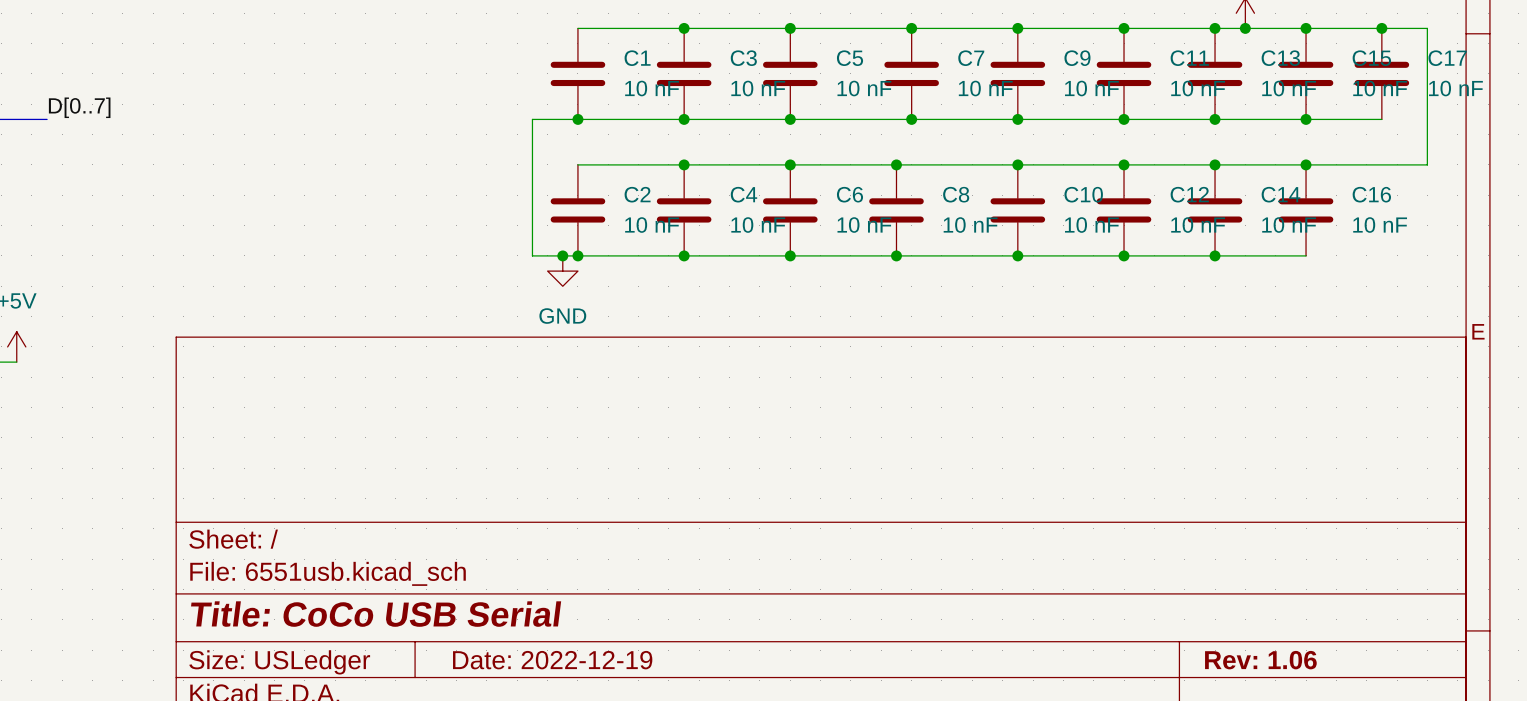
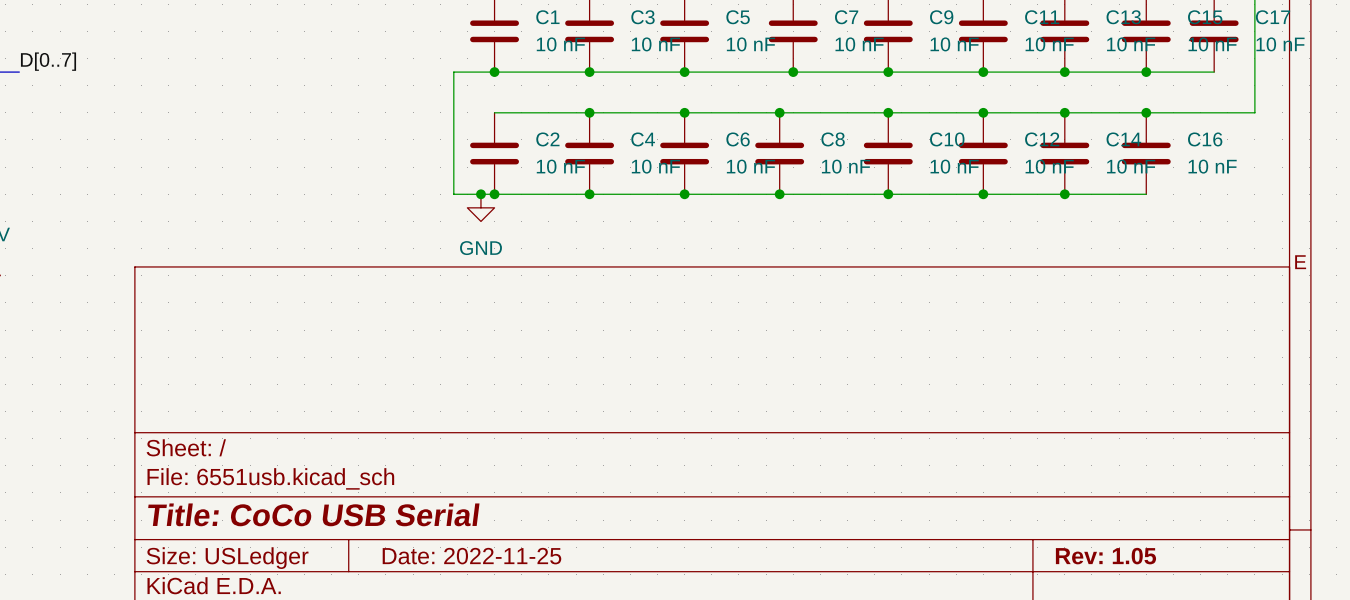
title block: Date: 2022-12-19 (552, 660) -> Date: 2022-11-25 (471, 556)
title block: Rev: 1.06 (1260, 660) -> Rev: 1.05 (1105, 556)

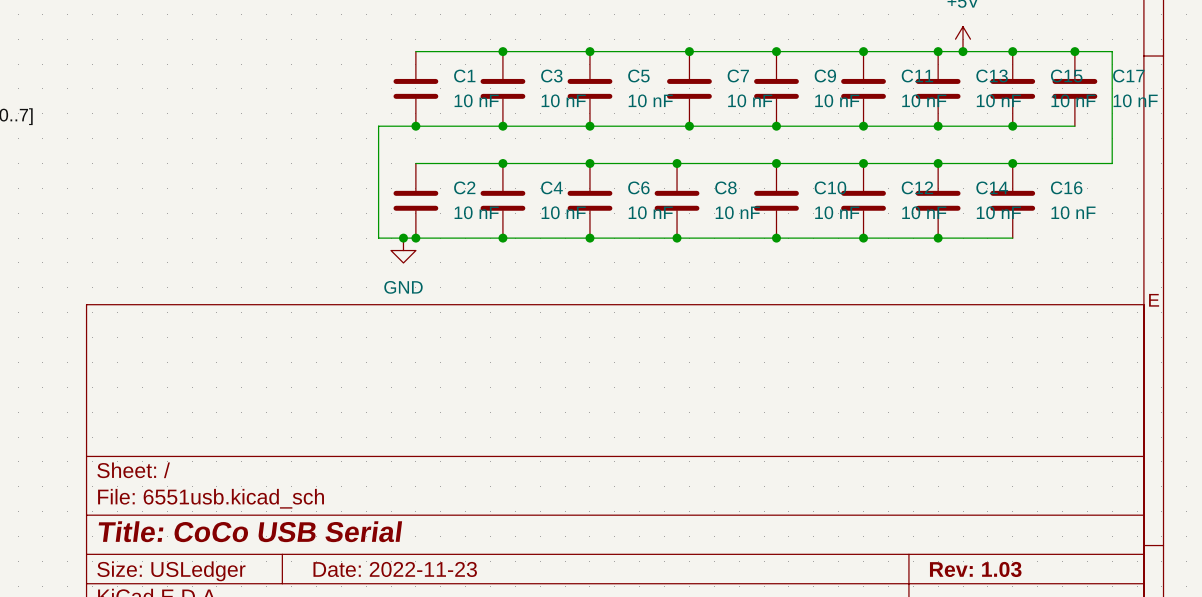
title block: Date: 2022-11-25 (471, 556) -> Date: 2022-11-23 (395, 569)
title block: Rev: 1.05 (1105, 556) -> Rev: 1.03 (975, 569)

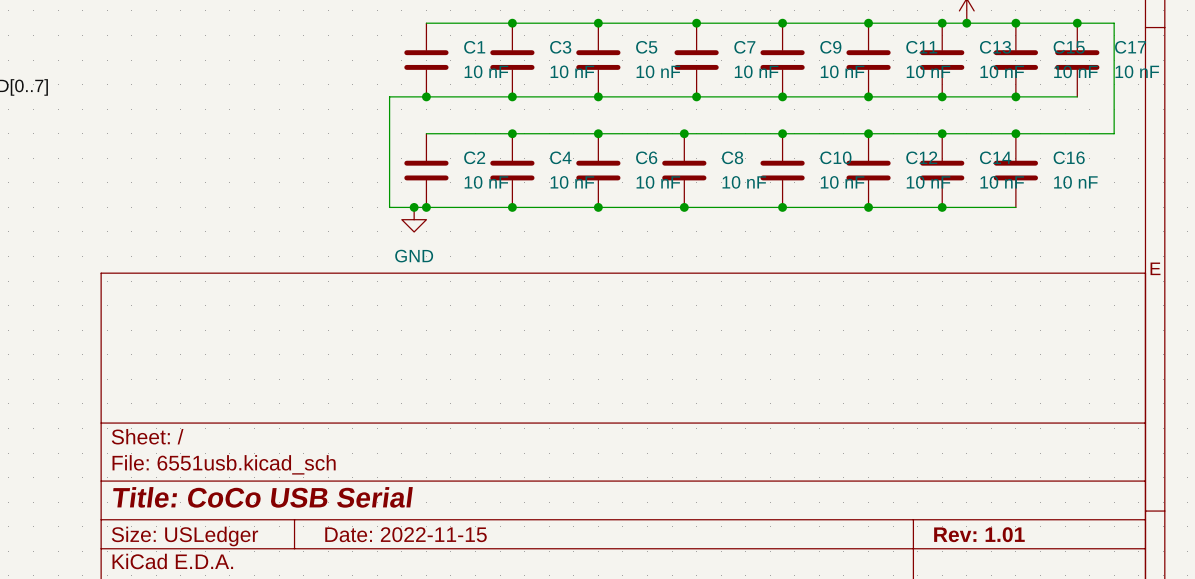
title block: Date: 2022-11-23 (395, 569) -> Date: 2022-11-15 (406, 534)
title block: Rev: 1.03 (975, 569) -> Rev: 1.01 (979, 534)

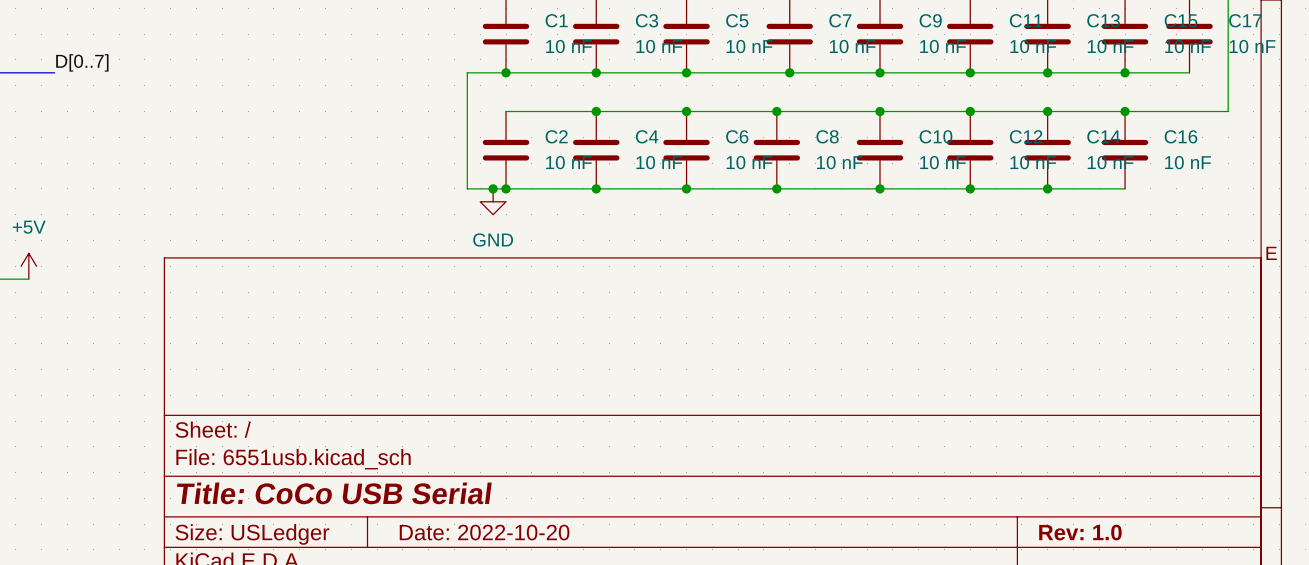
title block: Date: 2022-11-15 (406, 534) -> Date: 2022-10-20 (484, 532)
title block: Rev: 1.01 (979, 534) -> Rev: 1.0 (1080, 532)

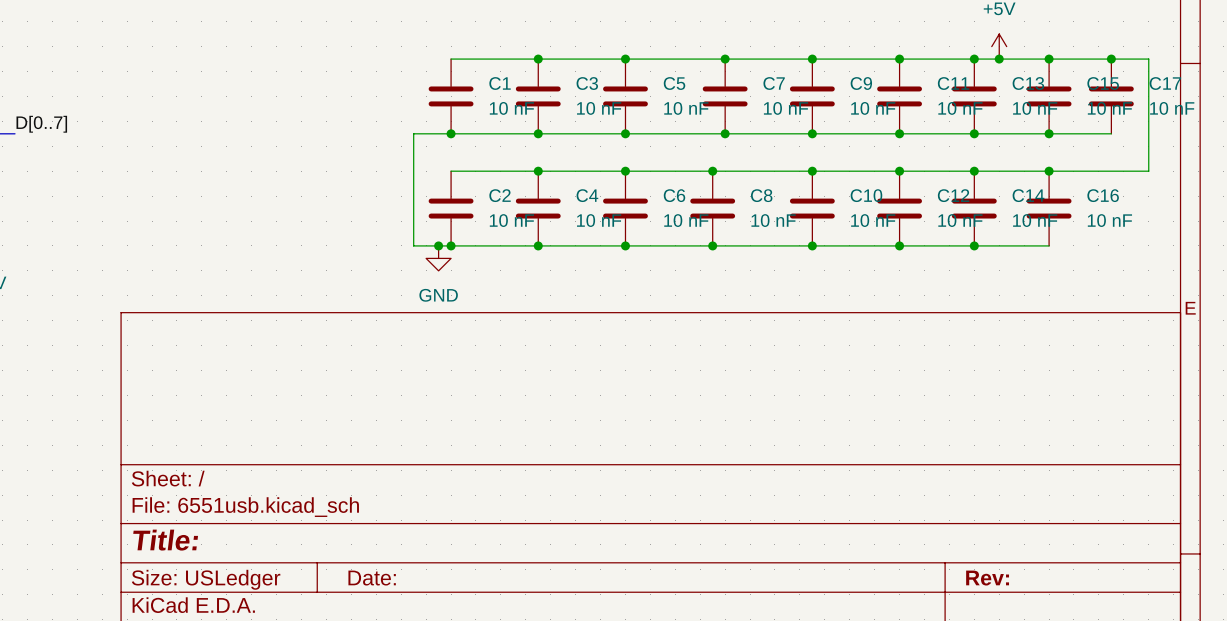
title block: Title: CoCo USB Serial (334, 493) -> Title: (165, 540)
title block: Date: 2022-10-20 (484, 532) -> Date: (372, 578)
title block: Rev: 1.0 (1080, 532) -> Rev: (987, 578)

